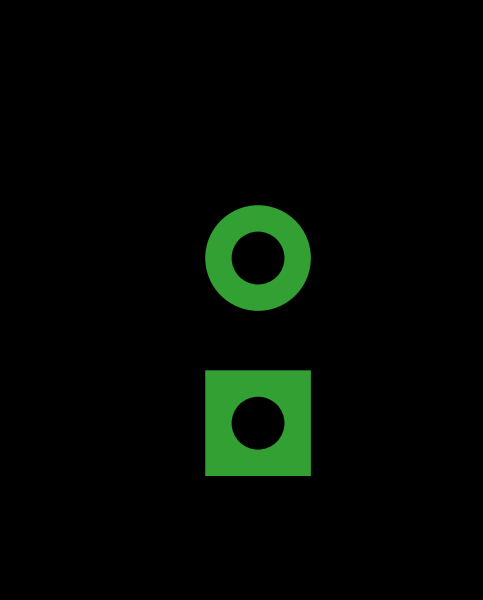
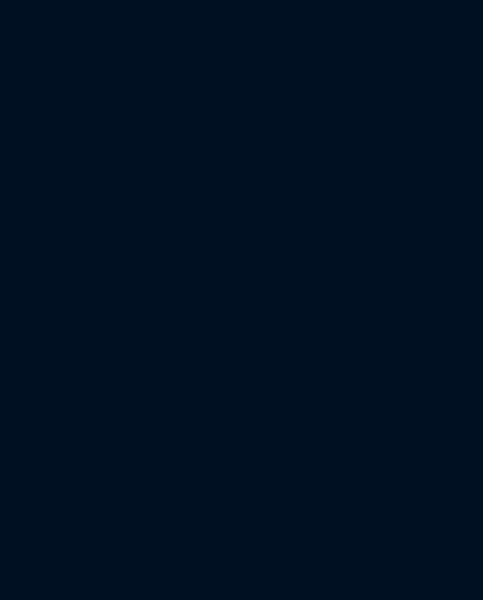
part: (258, 340) -> none

